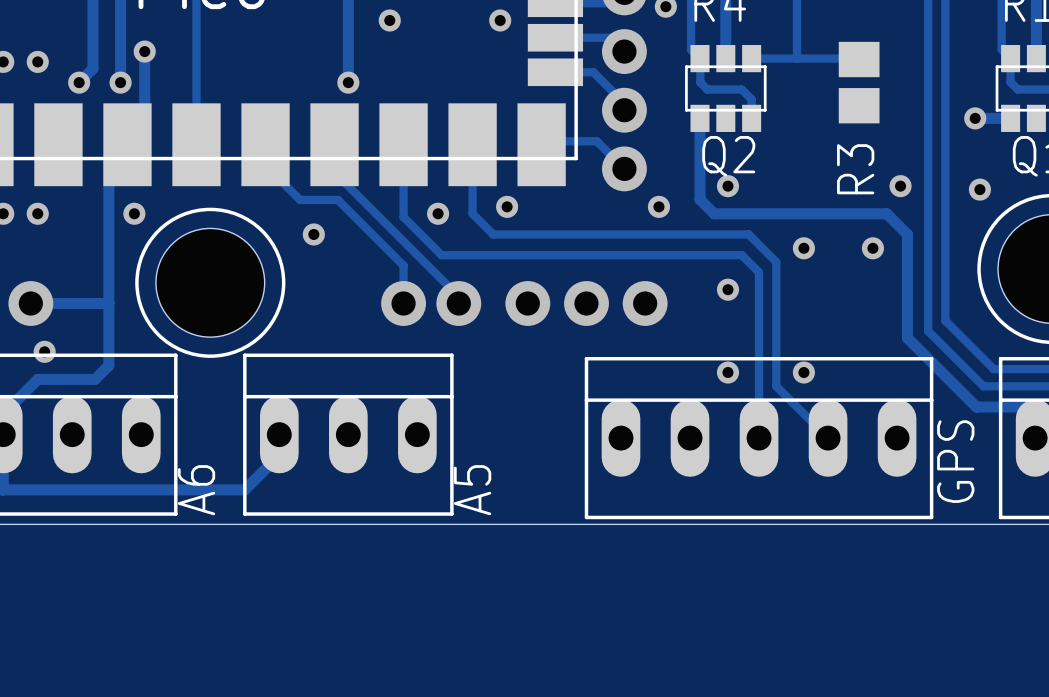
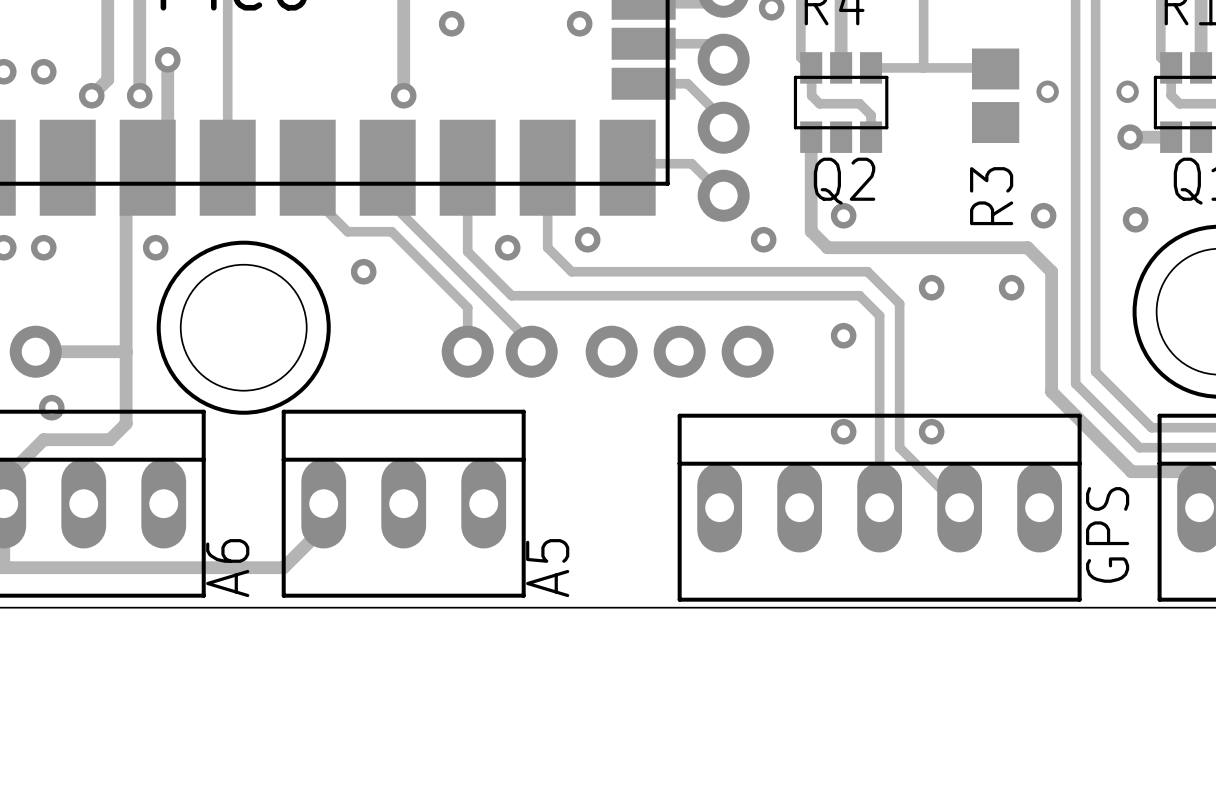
via: none -> (1047, 91)
via: none -> (1127, 91)

